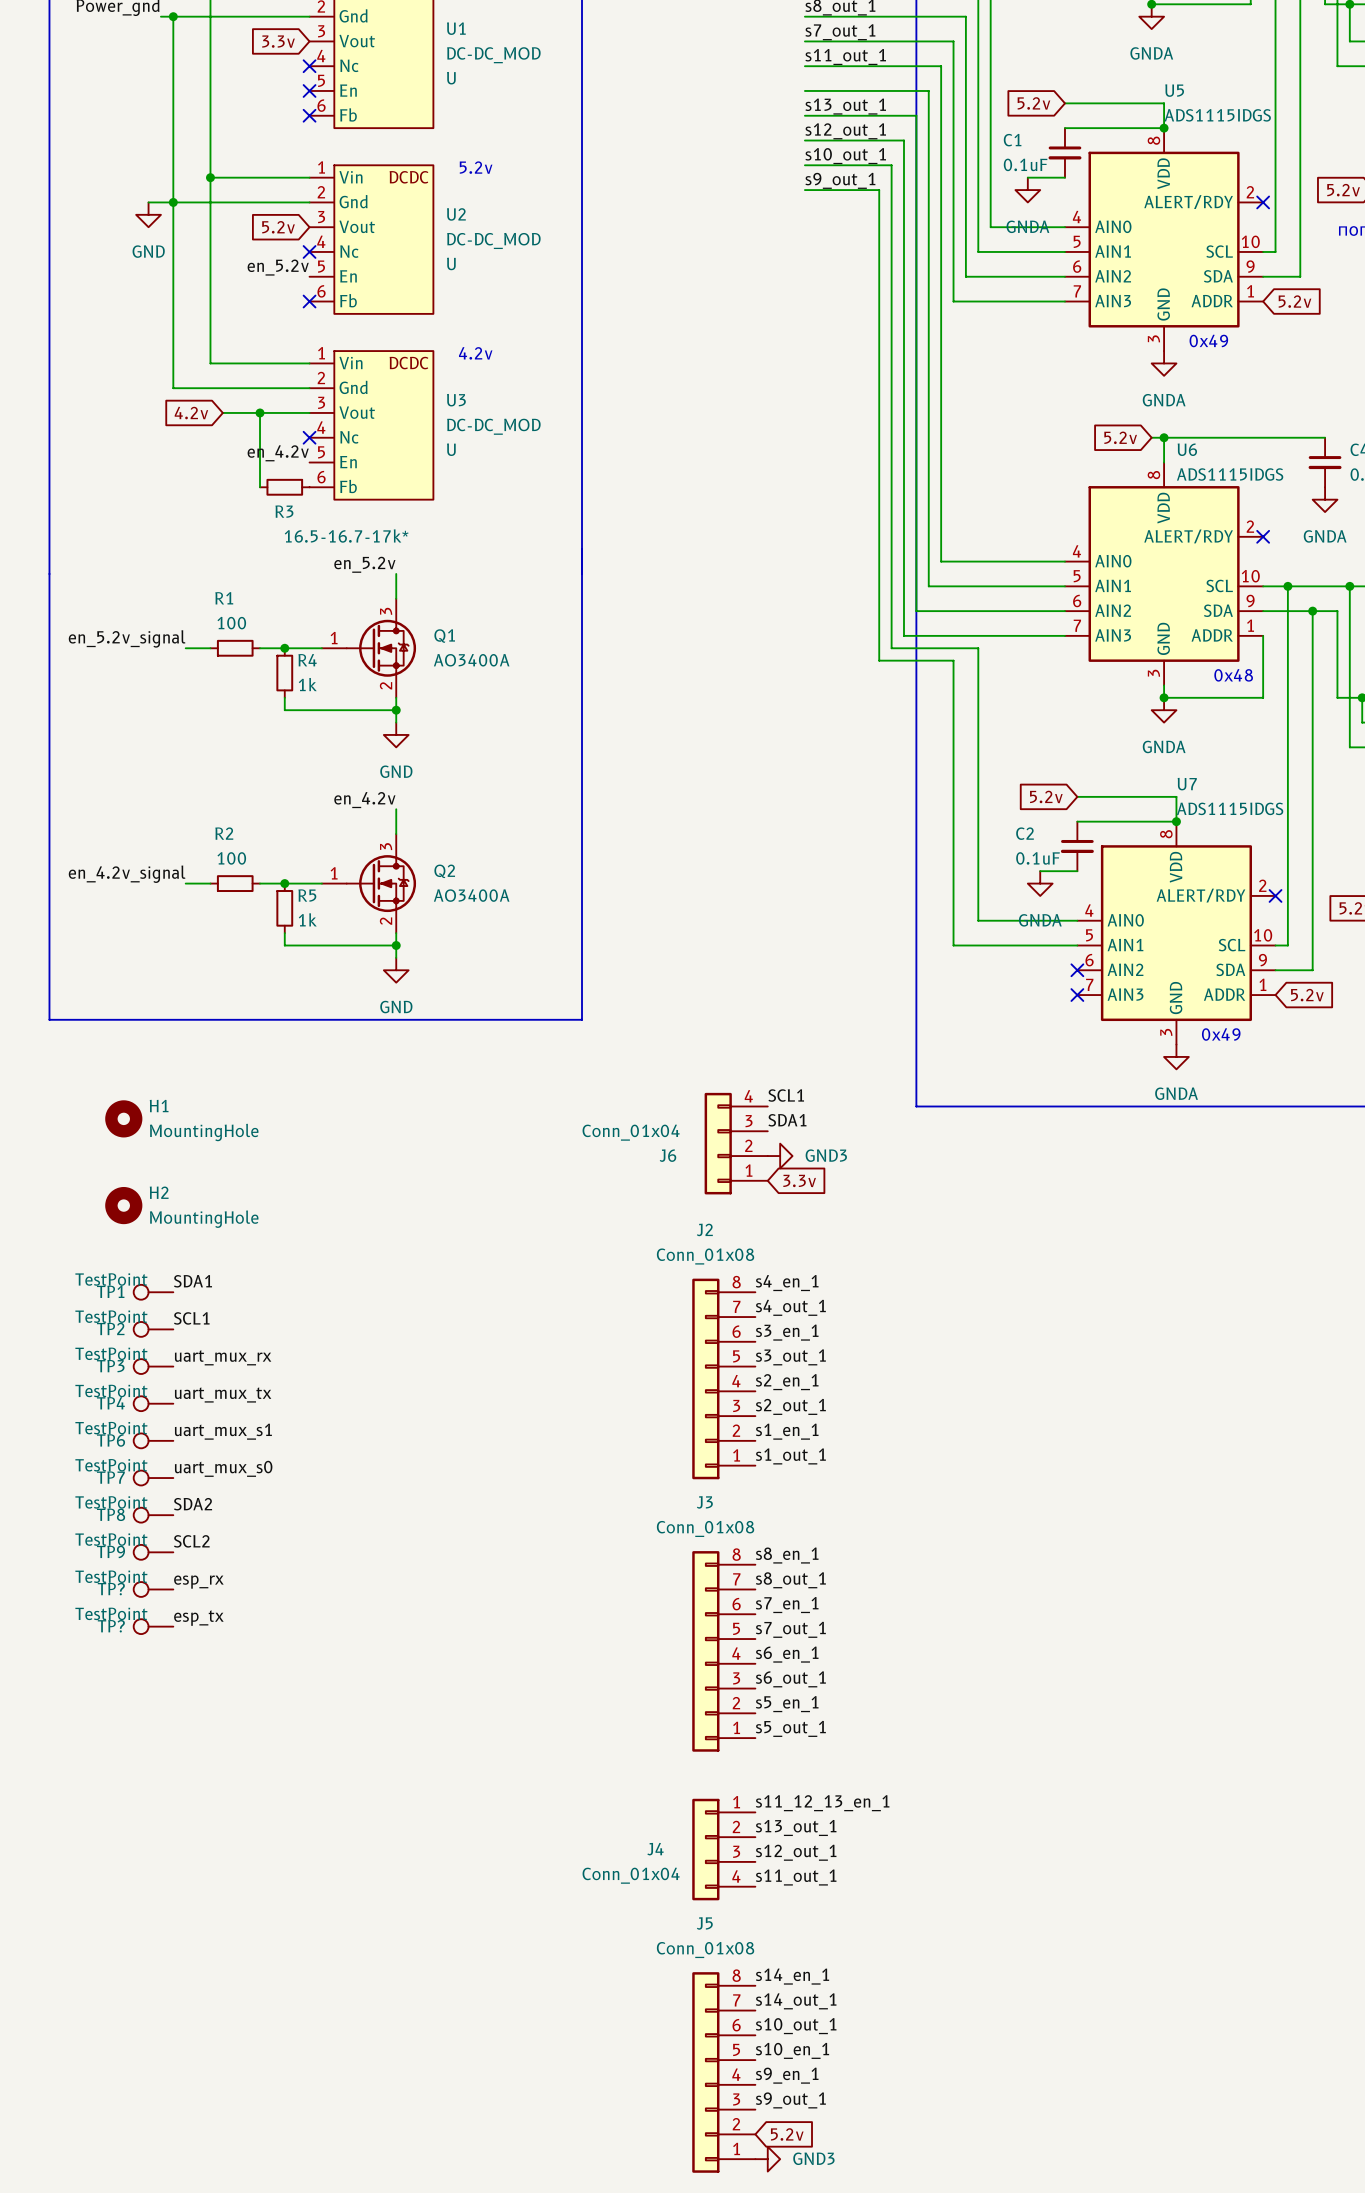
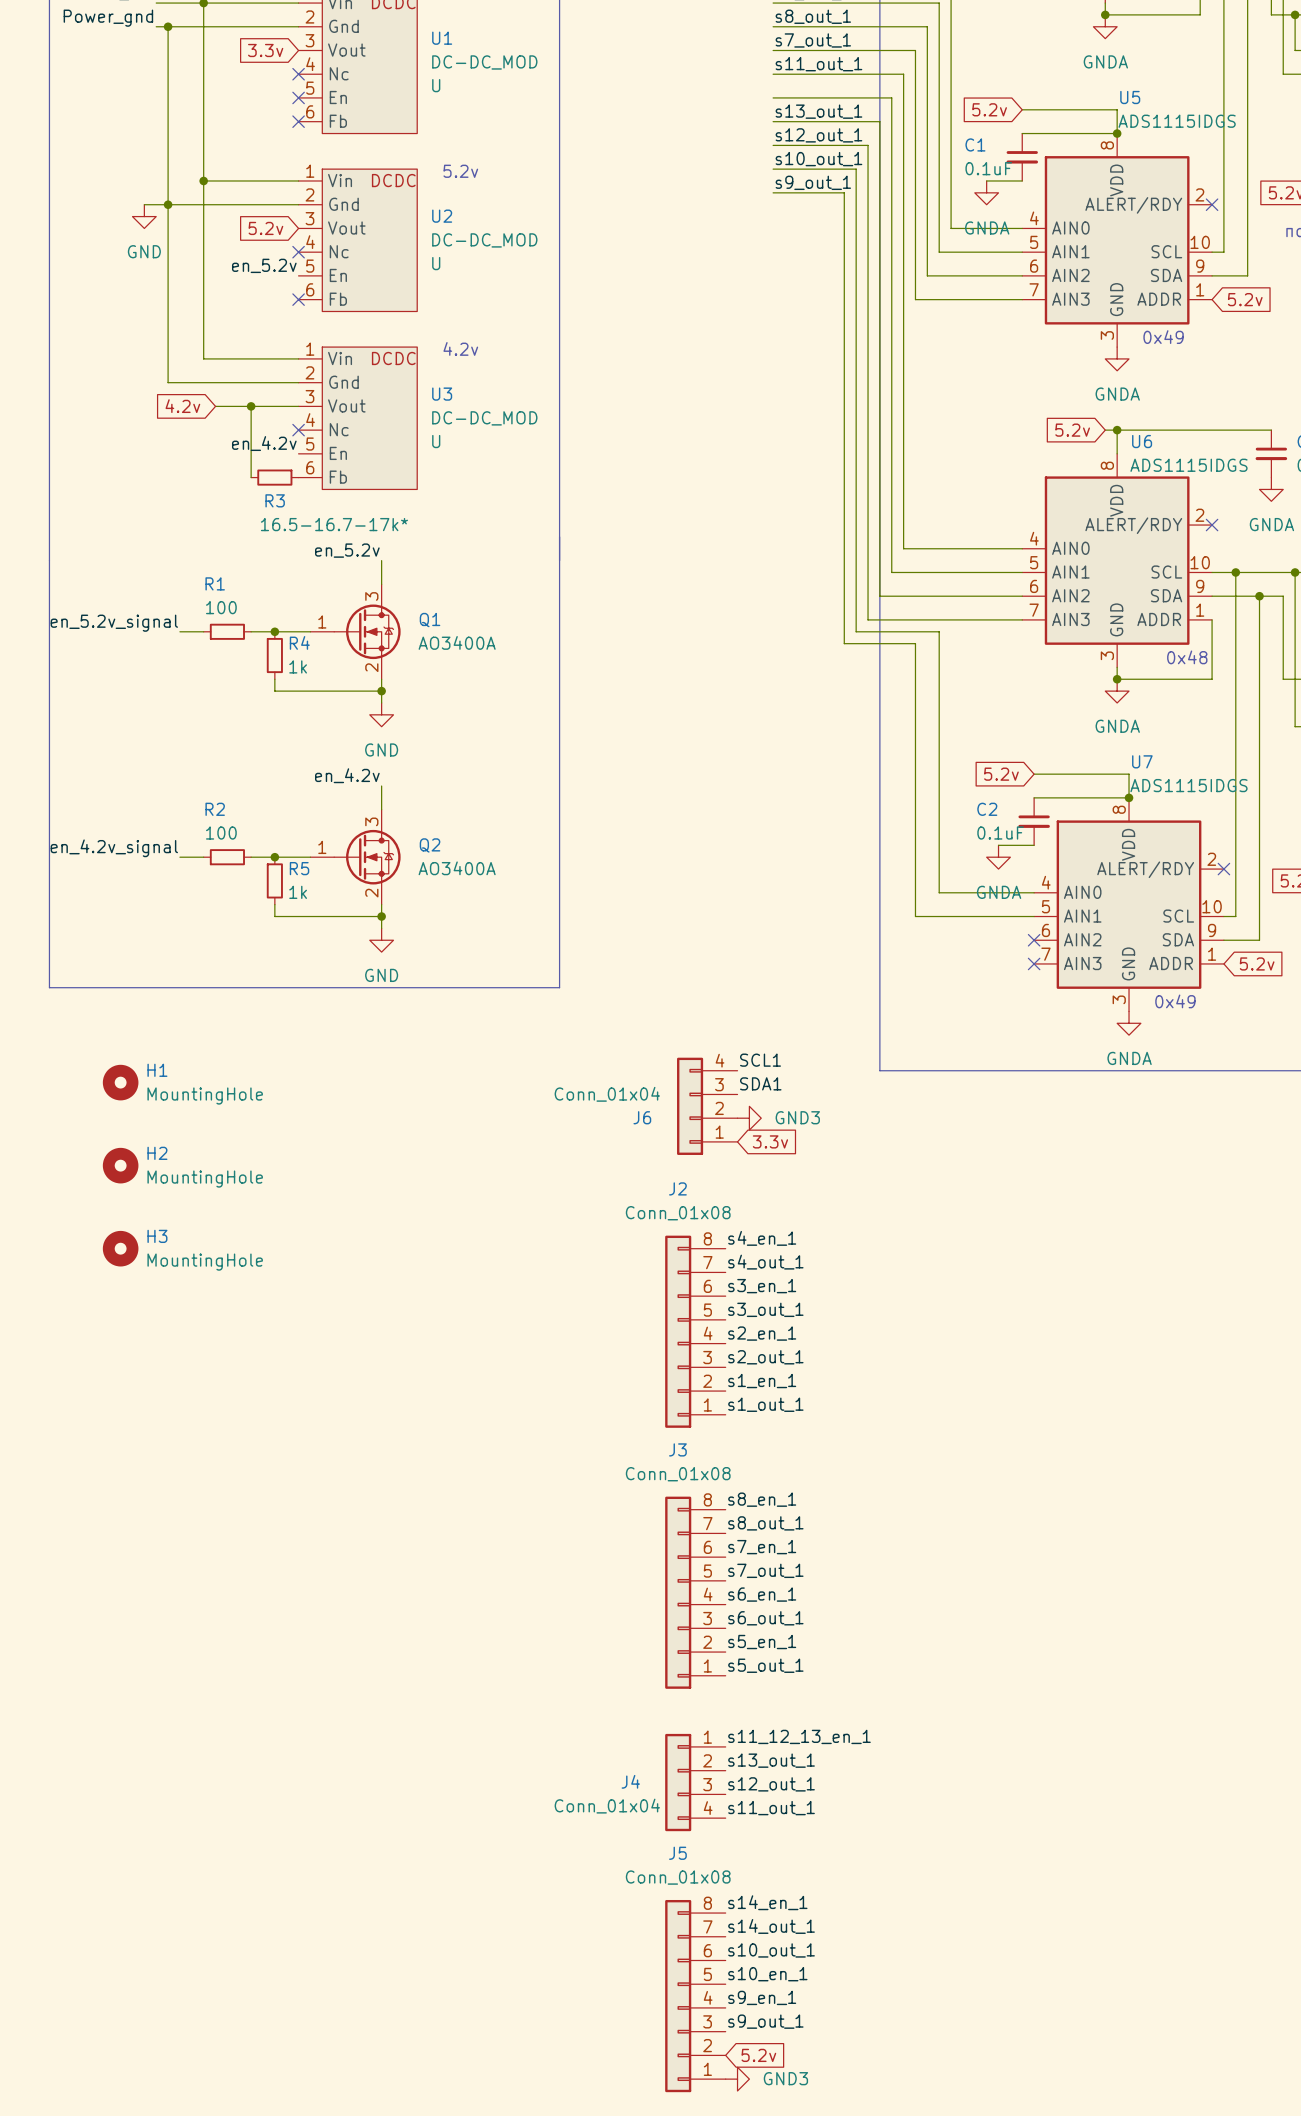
label: SDA1 (193, 1281) -> none
H3: none -> MountingHole (120, 1248)
TP1: TestPoint (153, 1292) -> none
label: SCL1 (191, 1318) -> none
TP2: TestPoint (153, 1329) -> none
label: uart_mux_rx (223, 1357) -> none
TP3: TestPoint (153, 1366) -> none
label: uart_mux_tx (223, 1394) -> none
TP4: TestPoint (153, 1403) -> none
label: uart_mux_s1 (223, 1431) -> none
TP6: TestPoint (153, 1440) -> none
label: uart_mux_s0 (223, 1468) -> none
TP7: TestPoint (153, 1478) -> none
label: SDA2 (193, 1504) -> none
TP8: TestPoint (153, 1515) -> none
label: SCL2 (191, 1541) -> none
TP9: TestPoint (153, 1552) -> none
label: esp_rx (198, 1582) -> none
TP?: TestPoint (153, 1589) -> none
label: esp_tx (198, 1618) -> none
TP?: TestPoint (153, 1626) -> none

